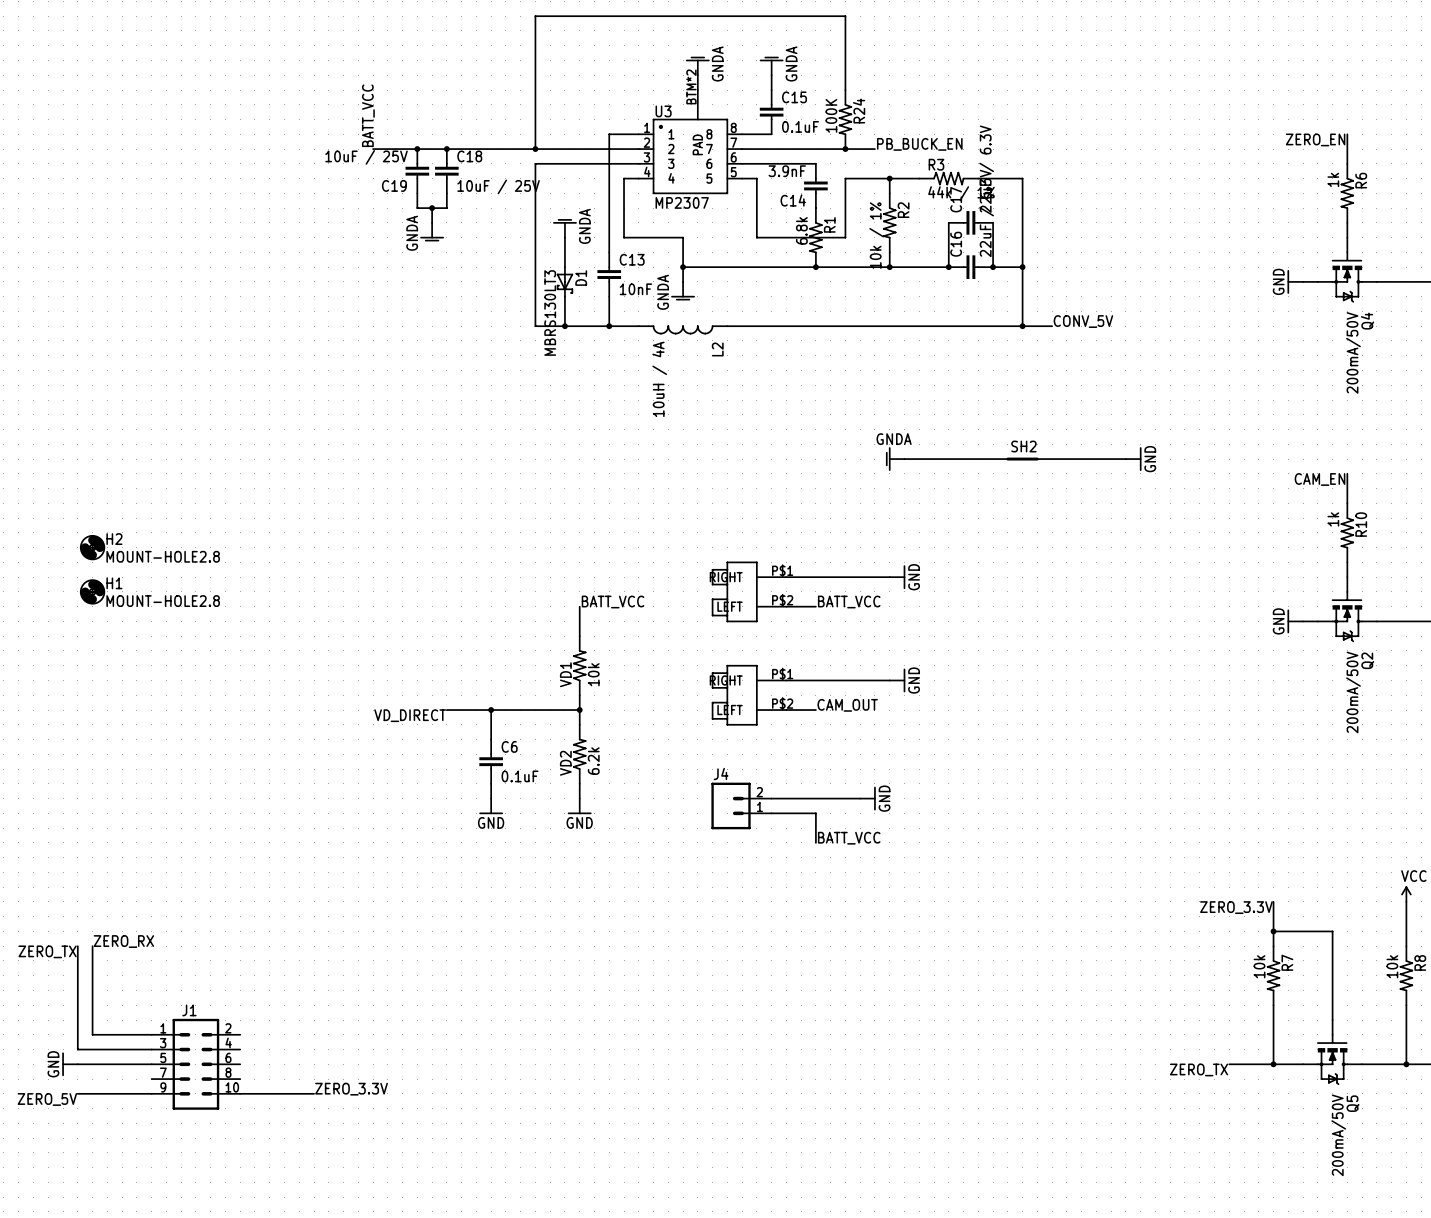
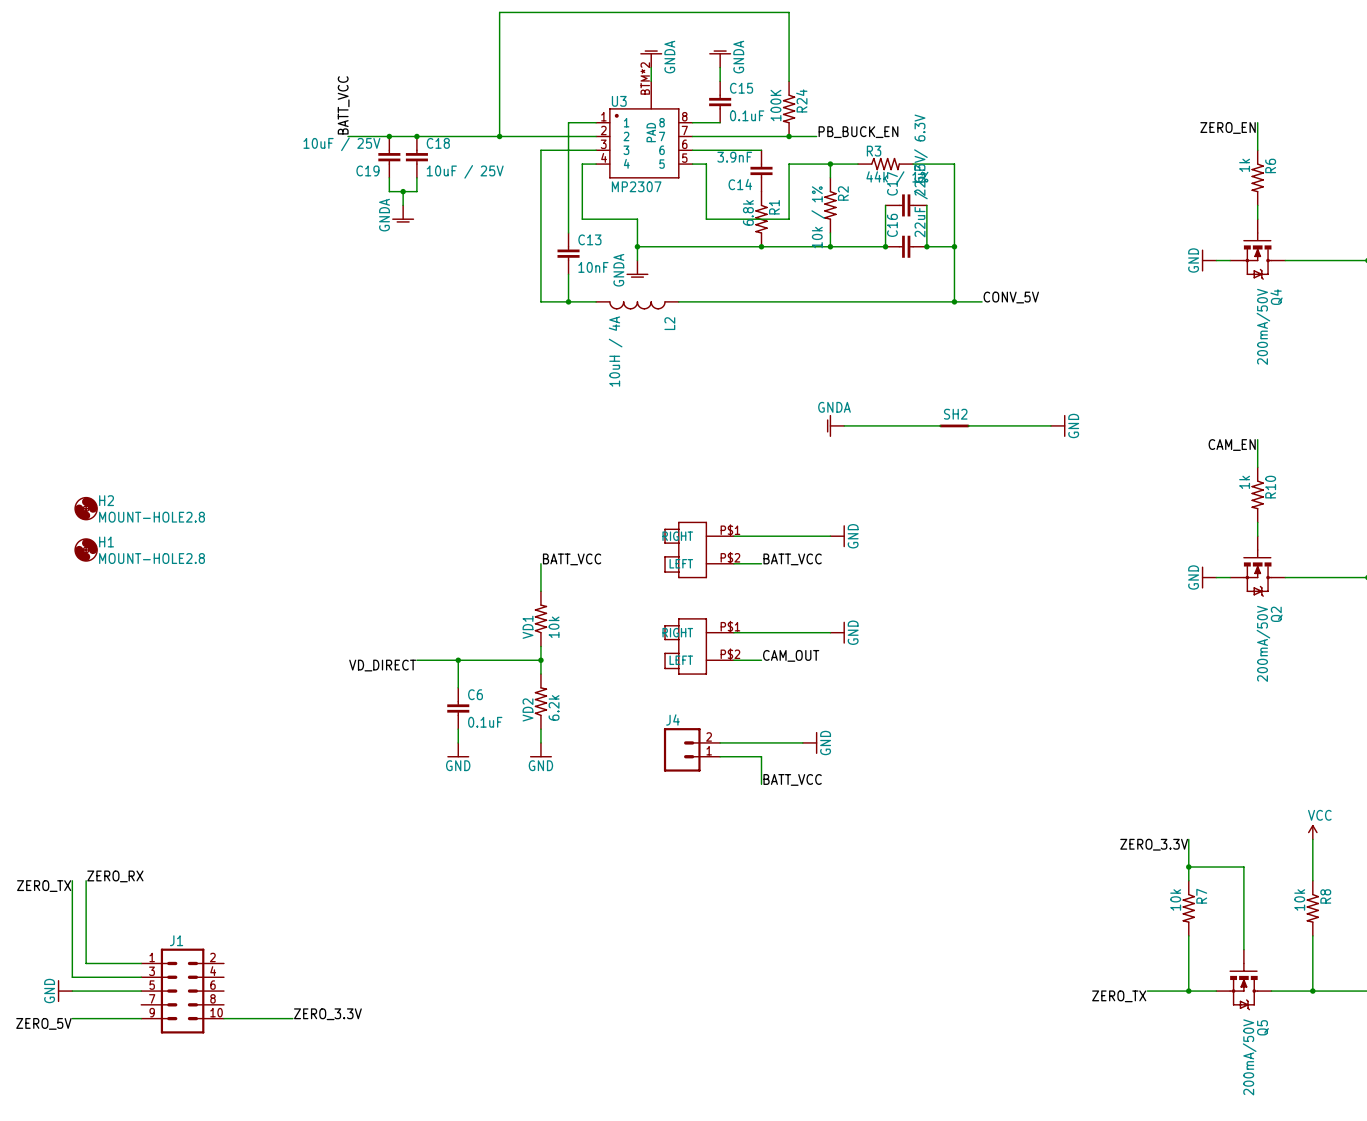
wire: (579, 163) (535, 163) (535, 326) (579, 326) -> (540, 150) (540, 301)
power symbol: GNDA (564, 228) -> none
wire: (564, 237) (564, 267) -> none
D1: MBRS130LT3 (564, 281) -> none
wire: (564, 296) (564, 326) -> none
junction: (564, 326) -> none

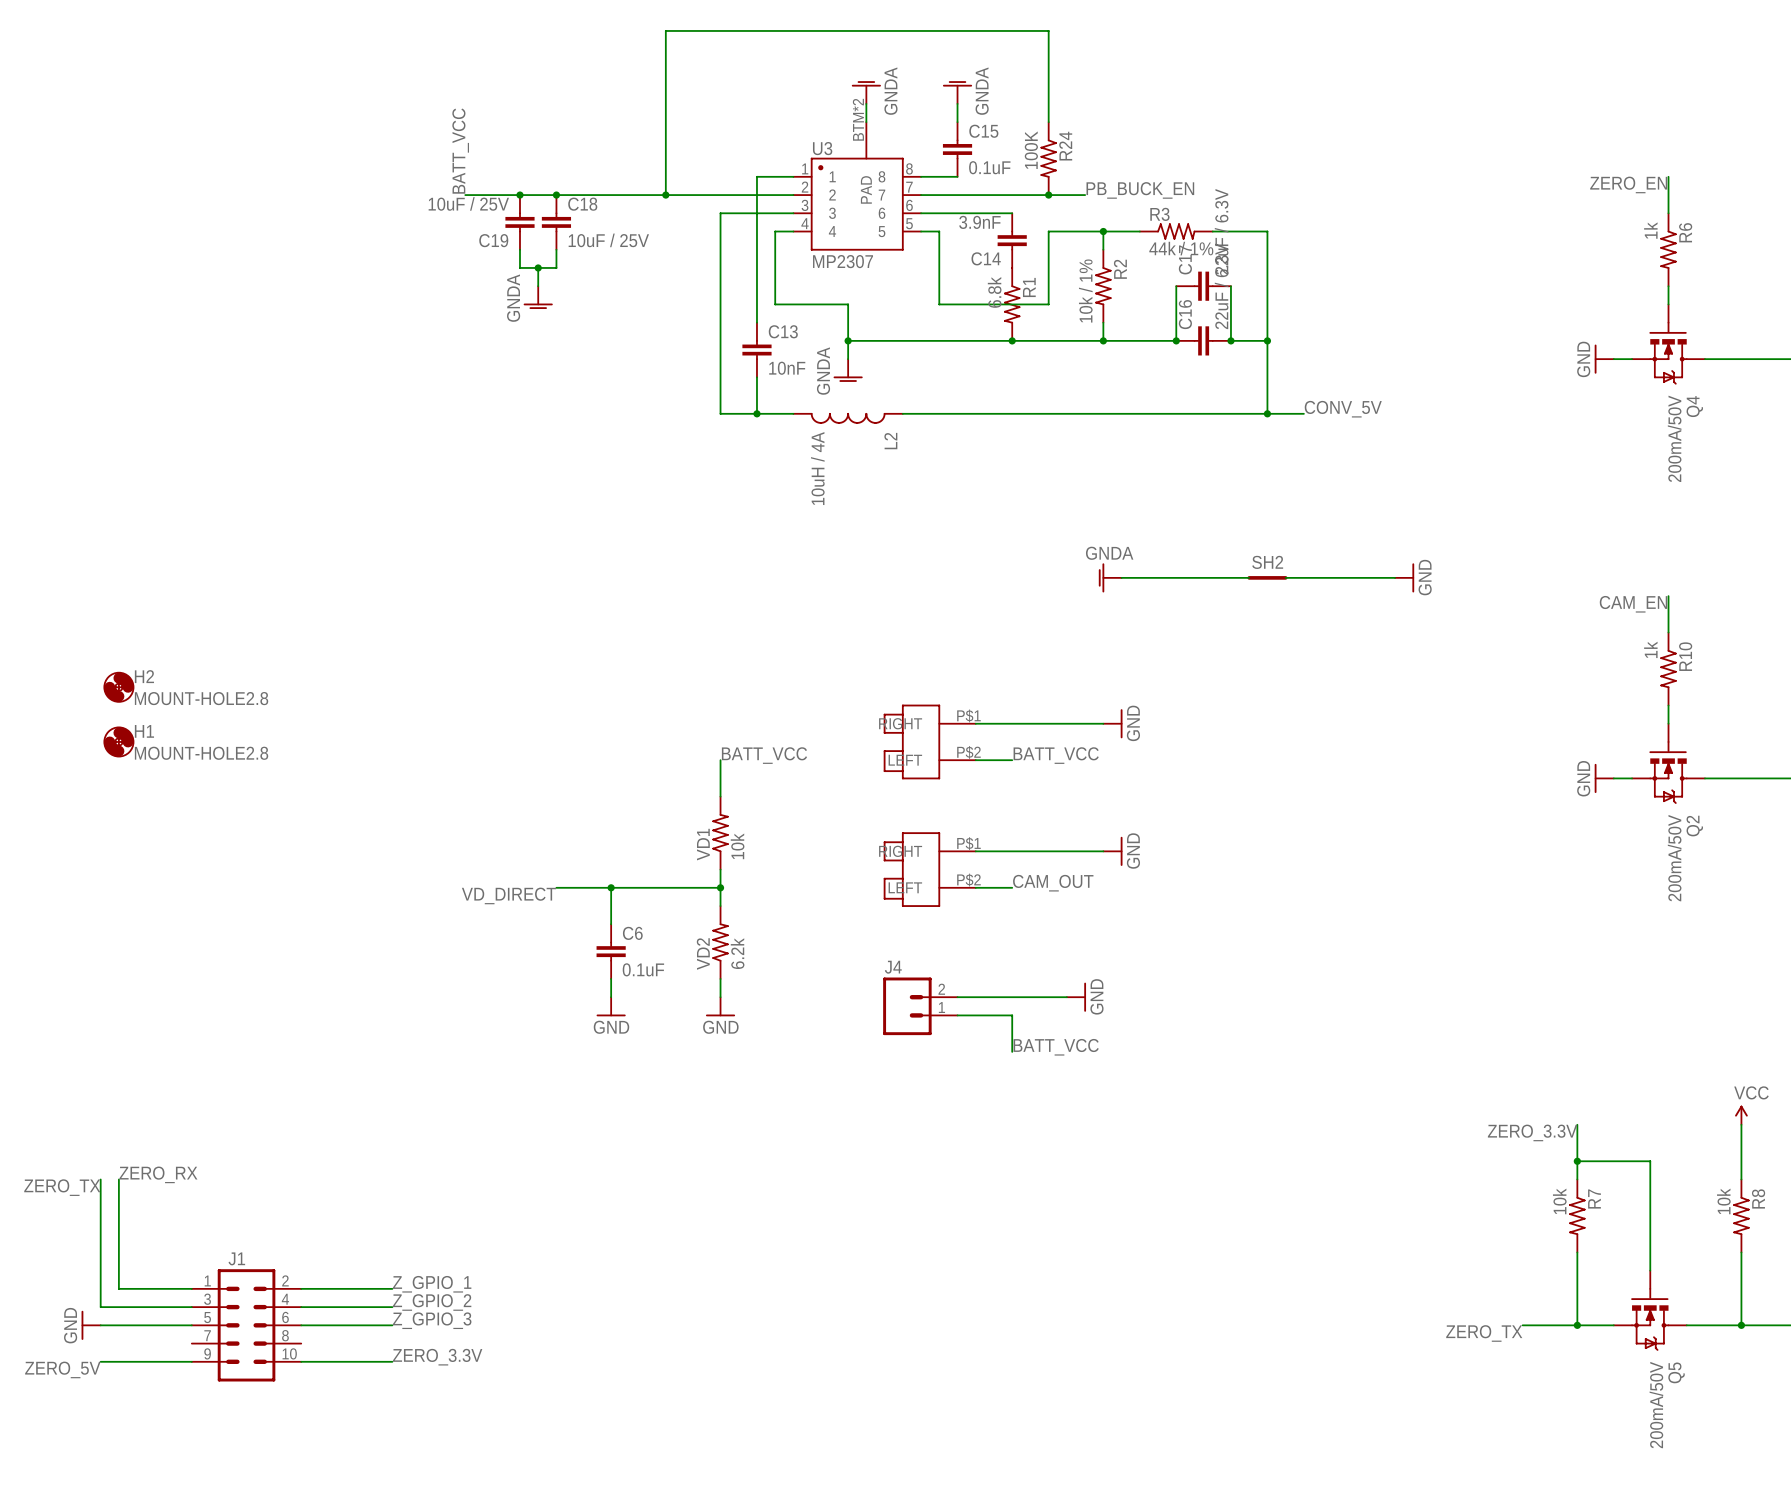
label: none -> Z_GPIO_1 (432, 1284)
wire: none -> (301, 1288) (392, 1288)
label: none -> Z_GPIO_2 (432, 1302)
wire: none -> (301, 1307) (392, 1307)
label: none -> Z_GPIO_3 (432, 1320)
wire: none -> (301, 1325) (392, 1325)

